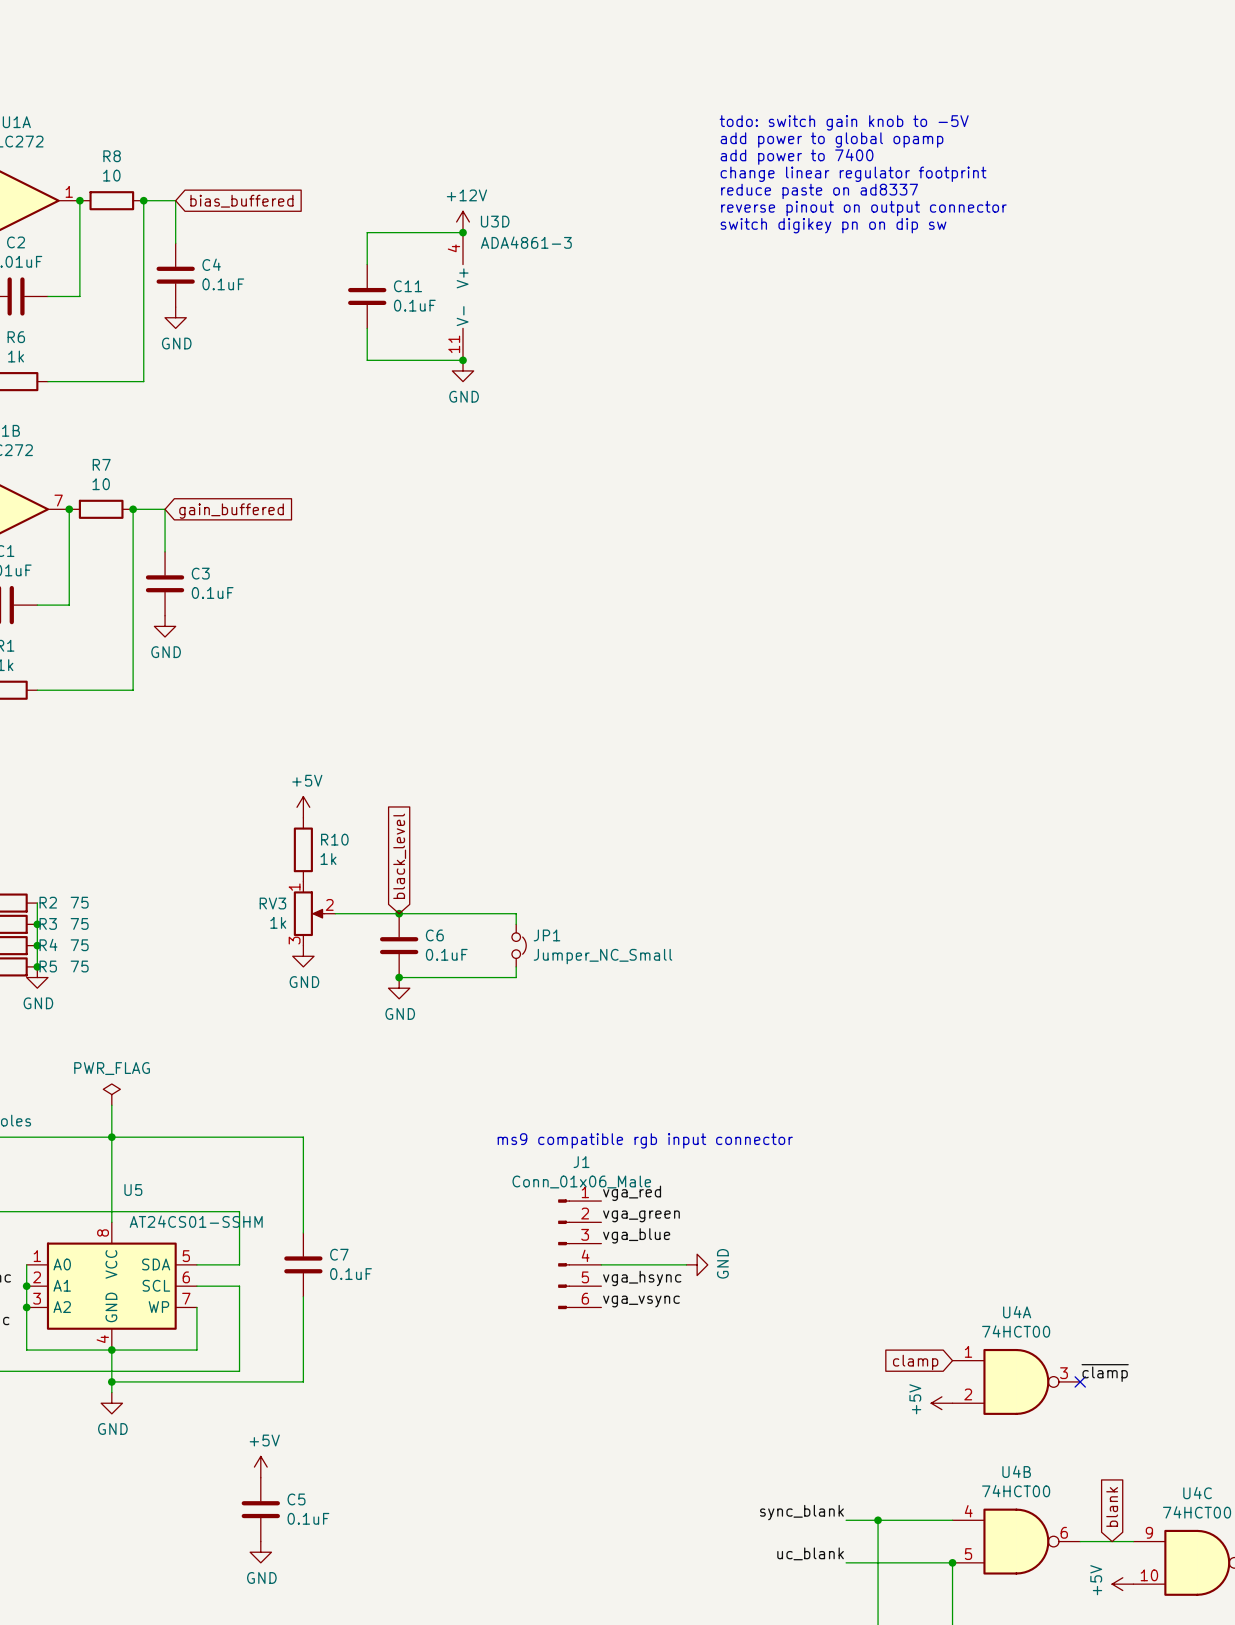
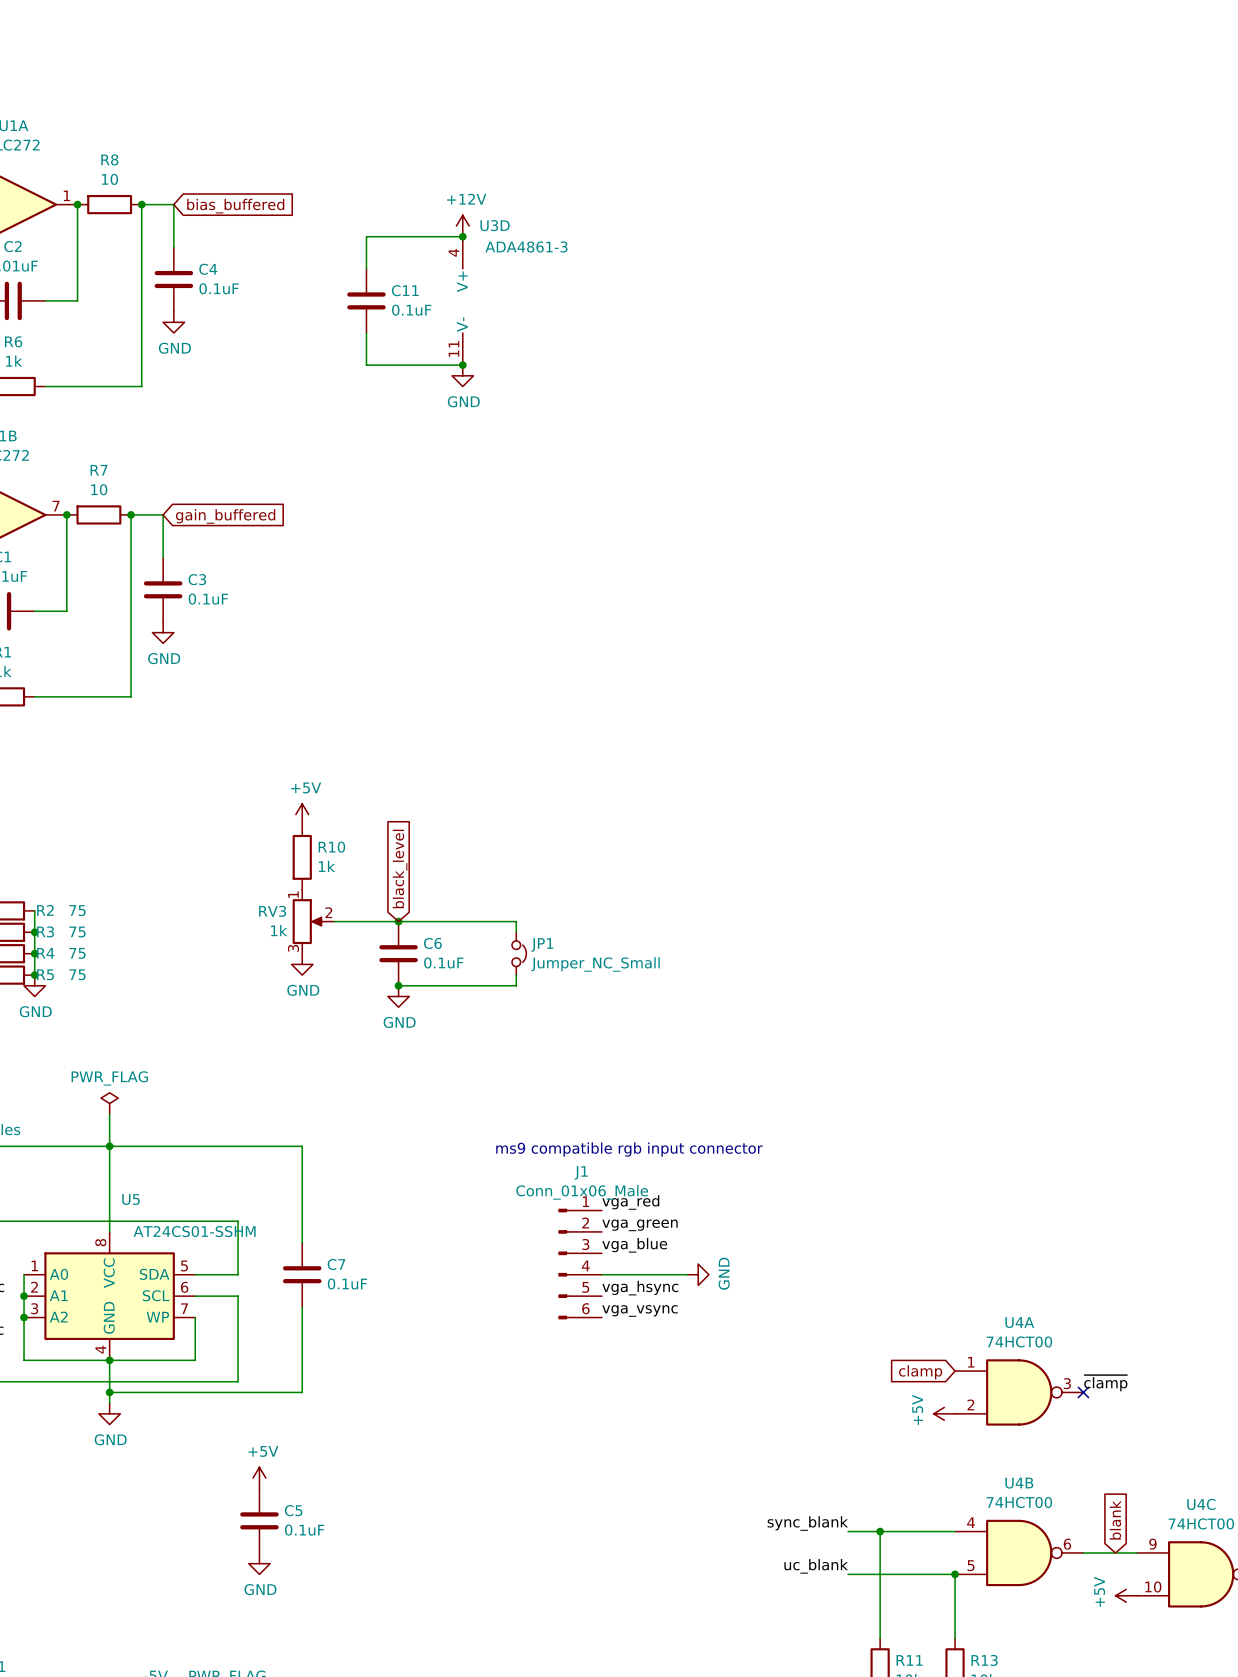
text: todo: switch gain knob to -5V (844, 122) -> none
text: add power to global opamp (832, 140) -> none
text: add power to 7400 (797, 156) -> none
text: change linear regulator footprint (853, 174) -> none
text: reduce paste on ad8337 (819, 191) -> none
text: reverse pinout on output connector (863, 208) -> none
text: switch digikey pn on dip sw (833, 225) -> none

